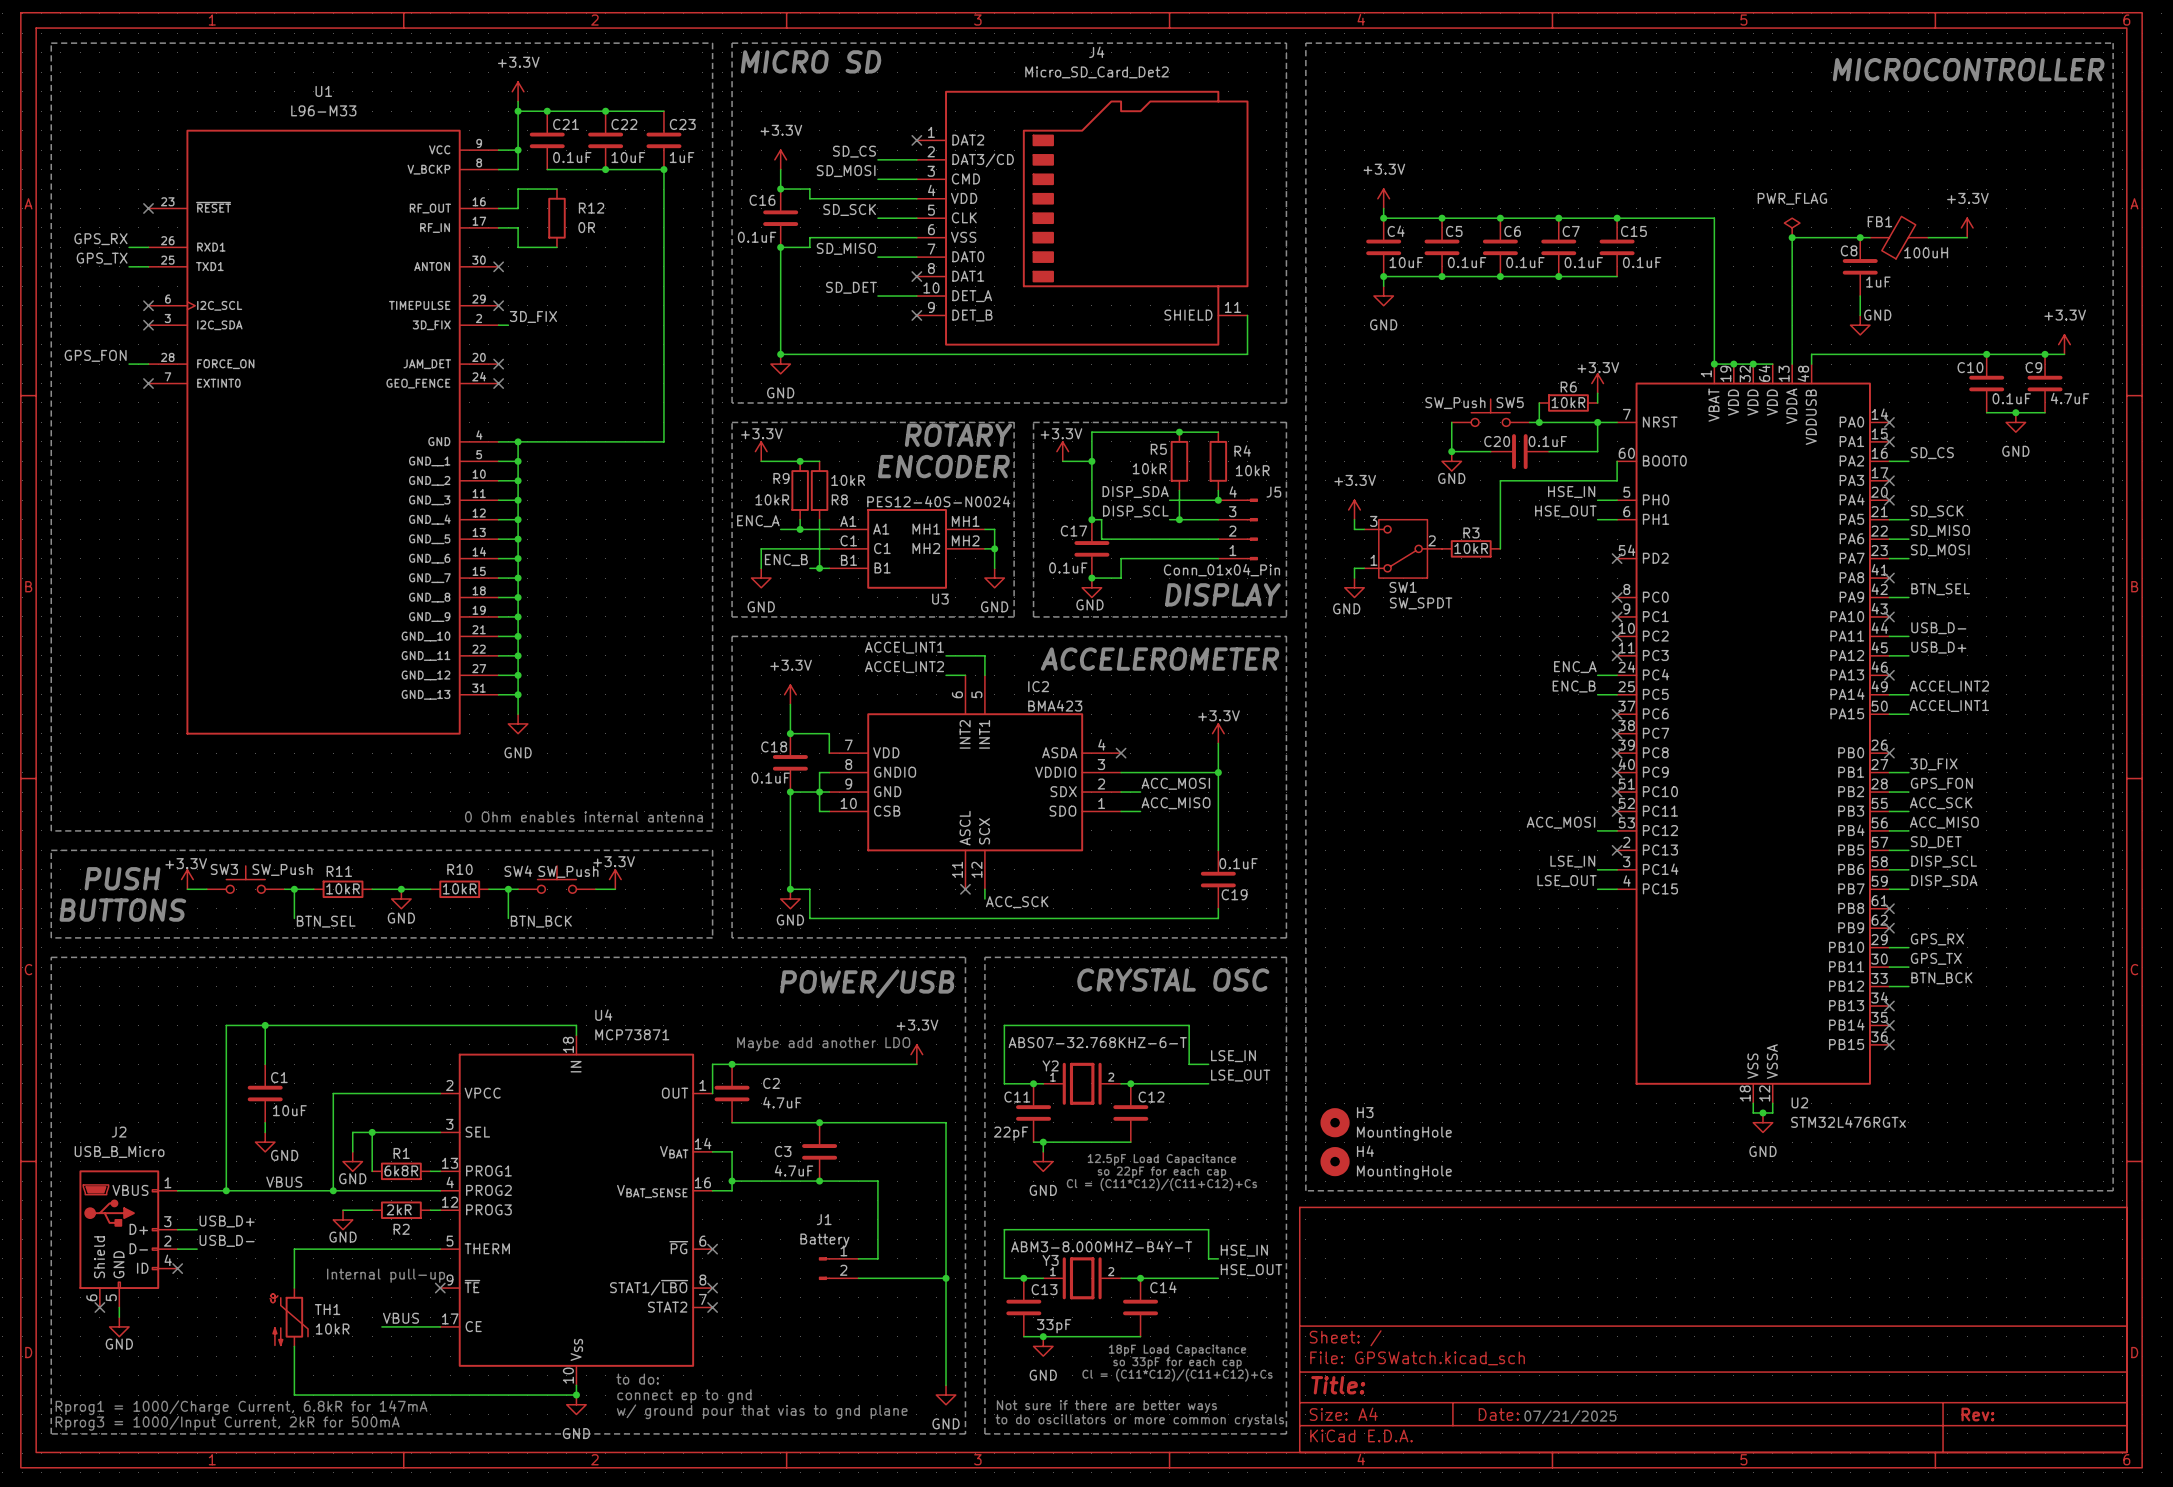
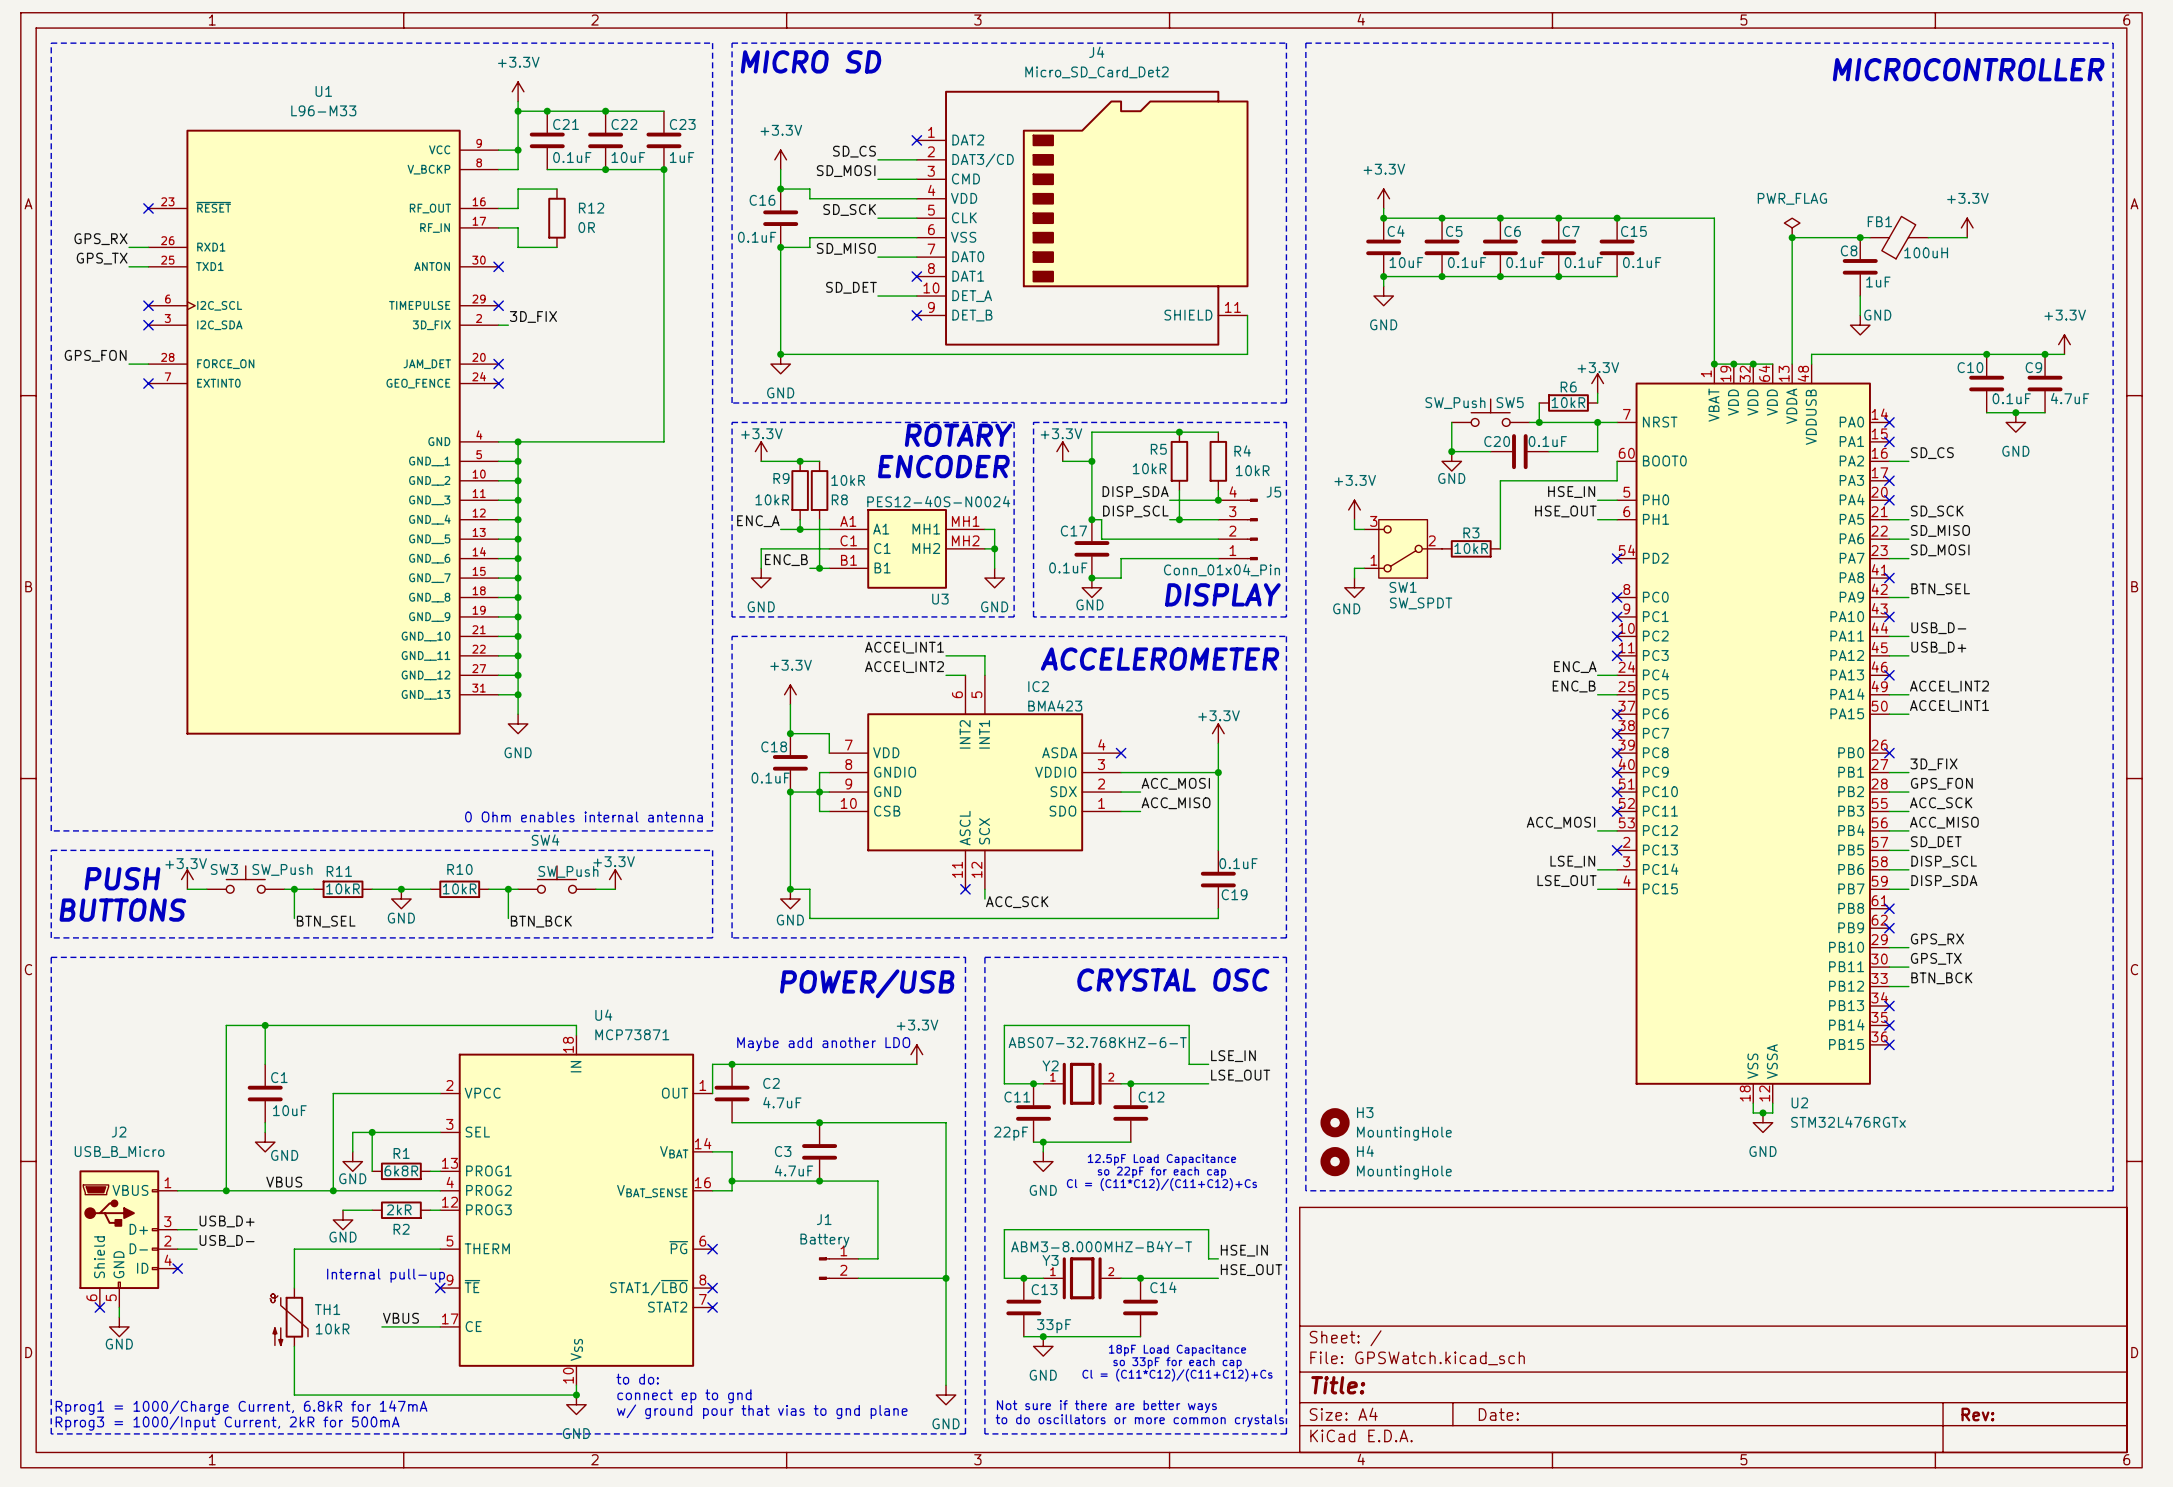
SW4 name position: SW4 (518, 871) -> SW4 (545, 840)
text: 07/21/2025 (1570, 1417) -> none

